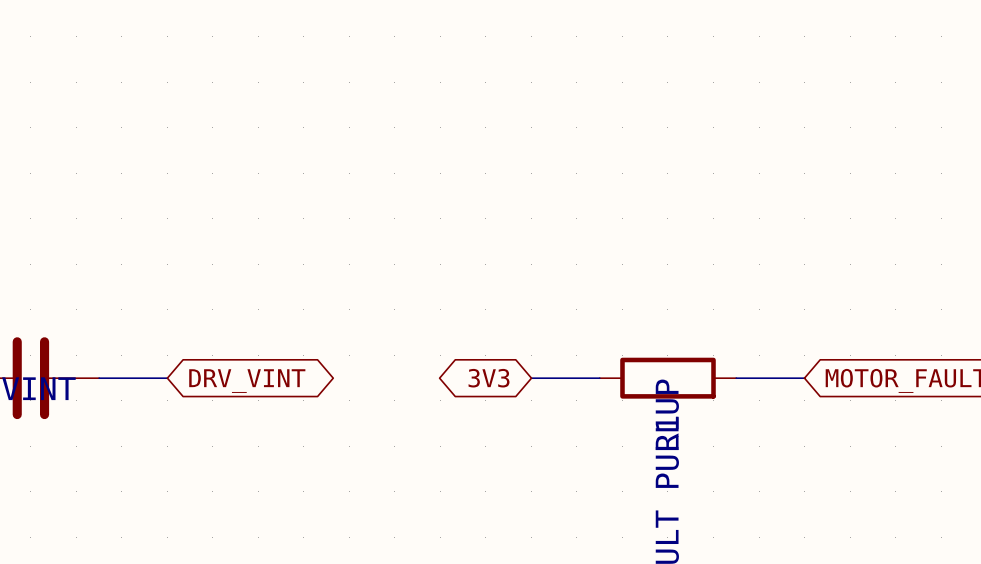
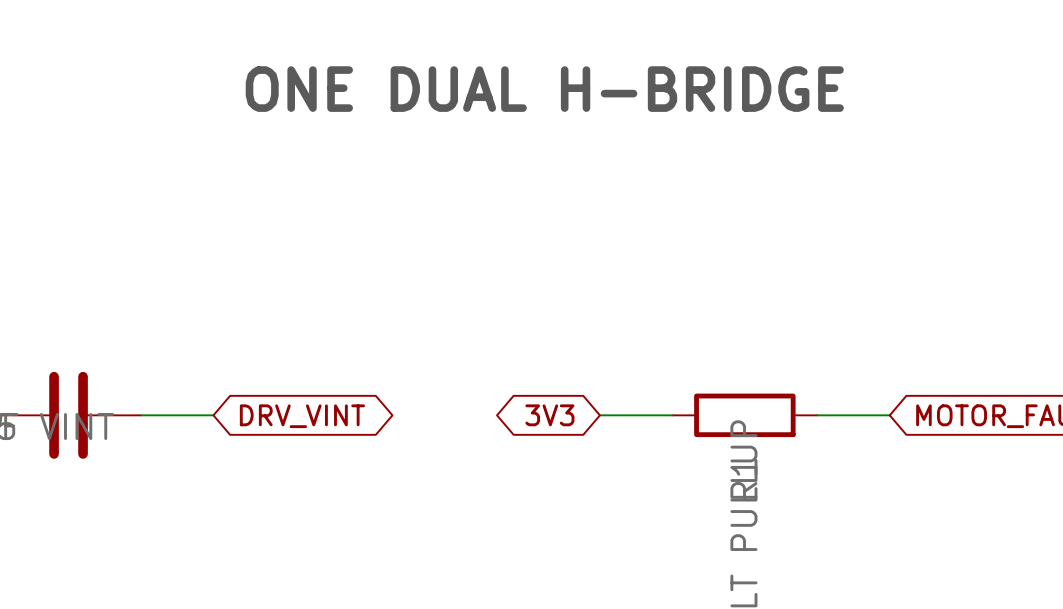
text: none -> ONE DUAL H-BRIDGE (544, 89)

